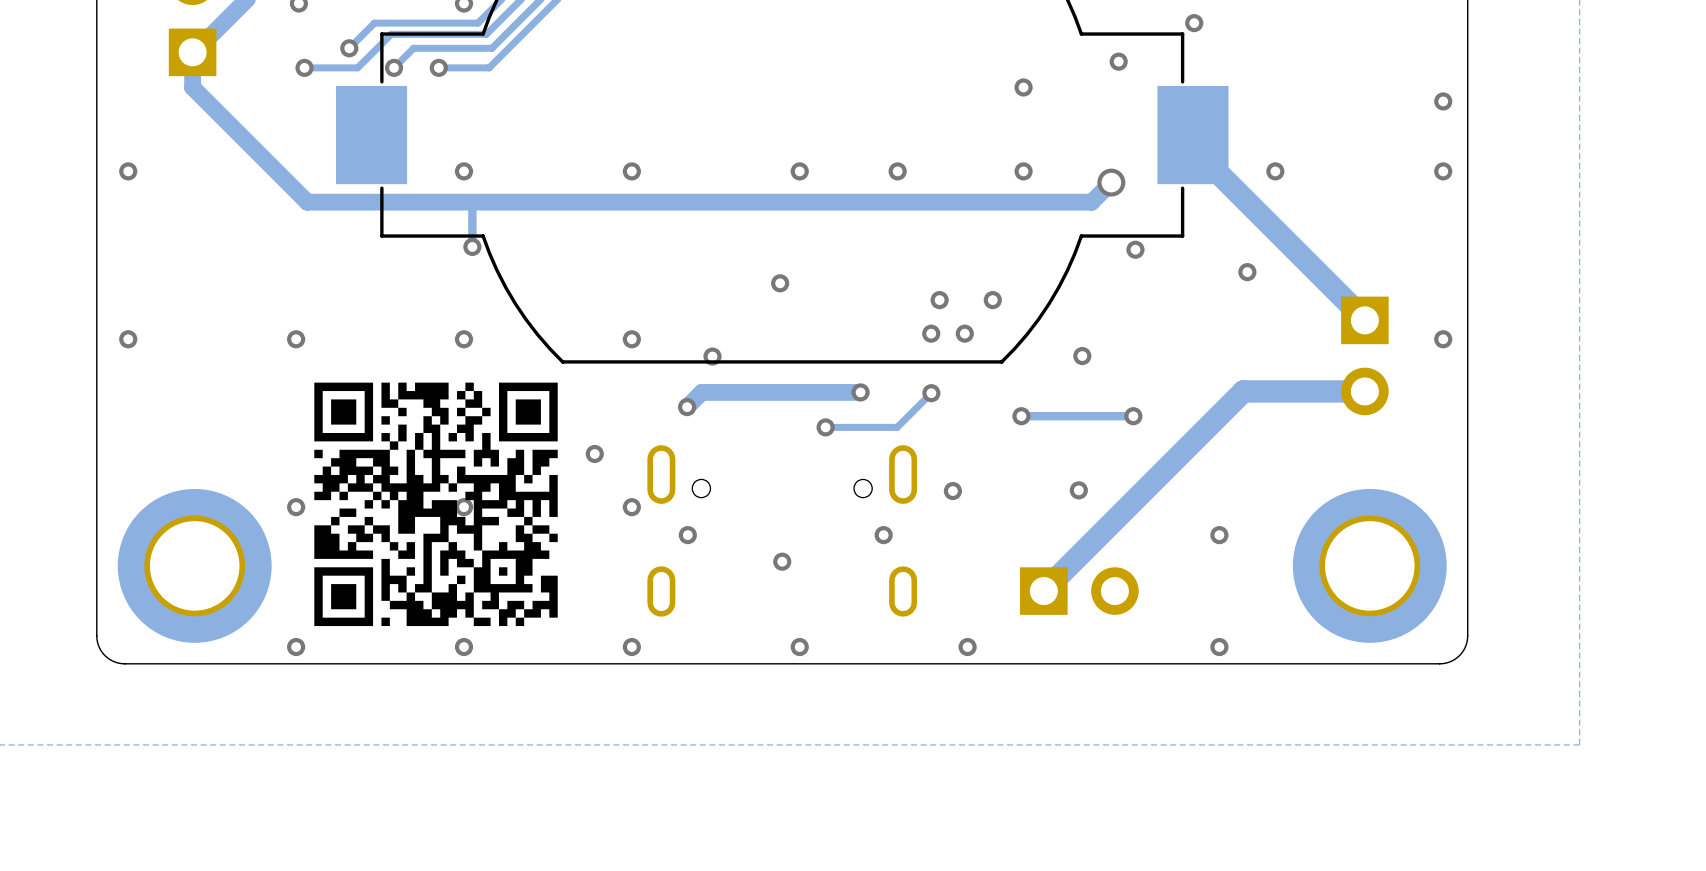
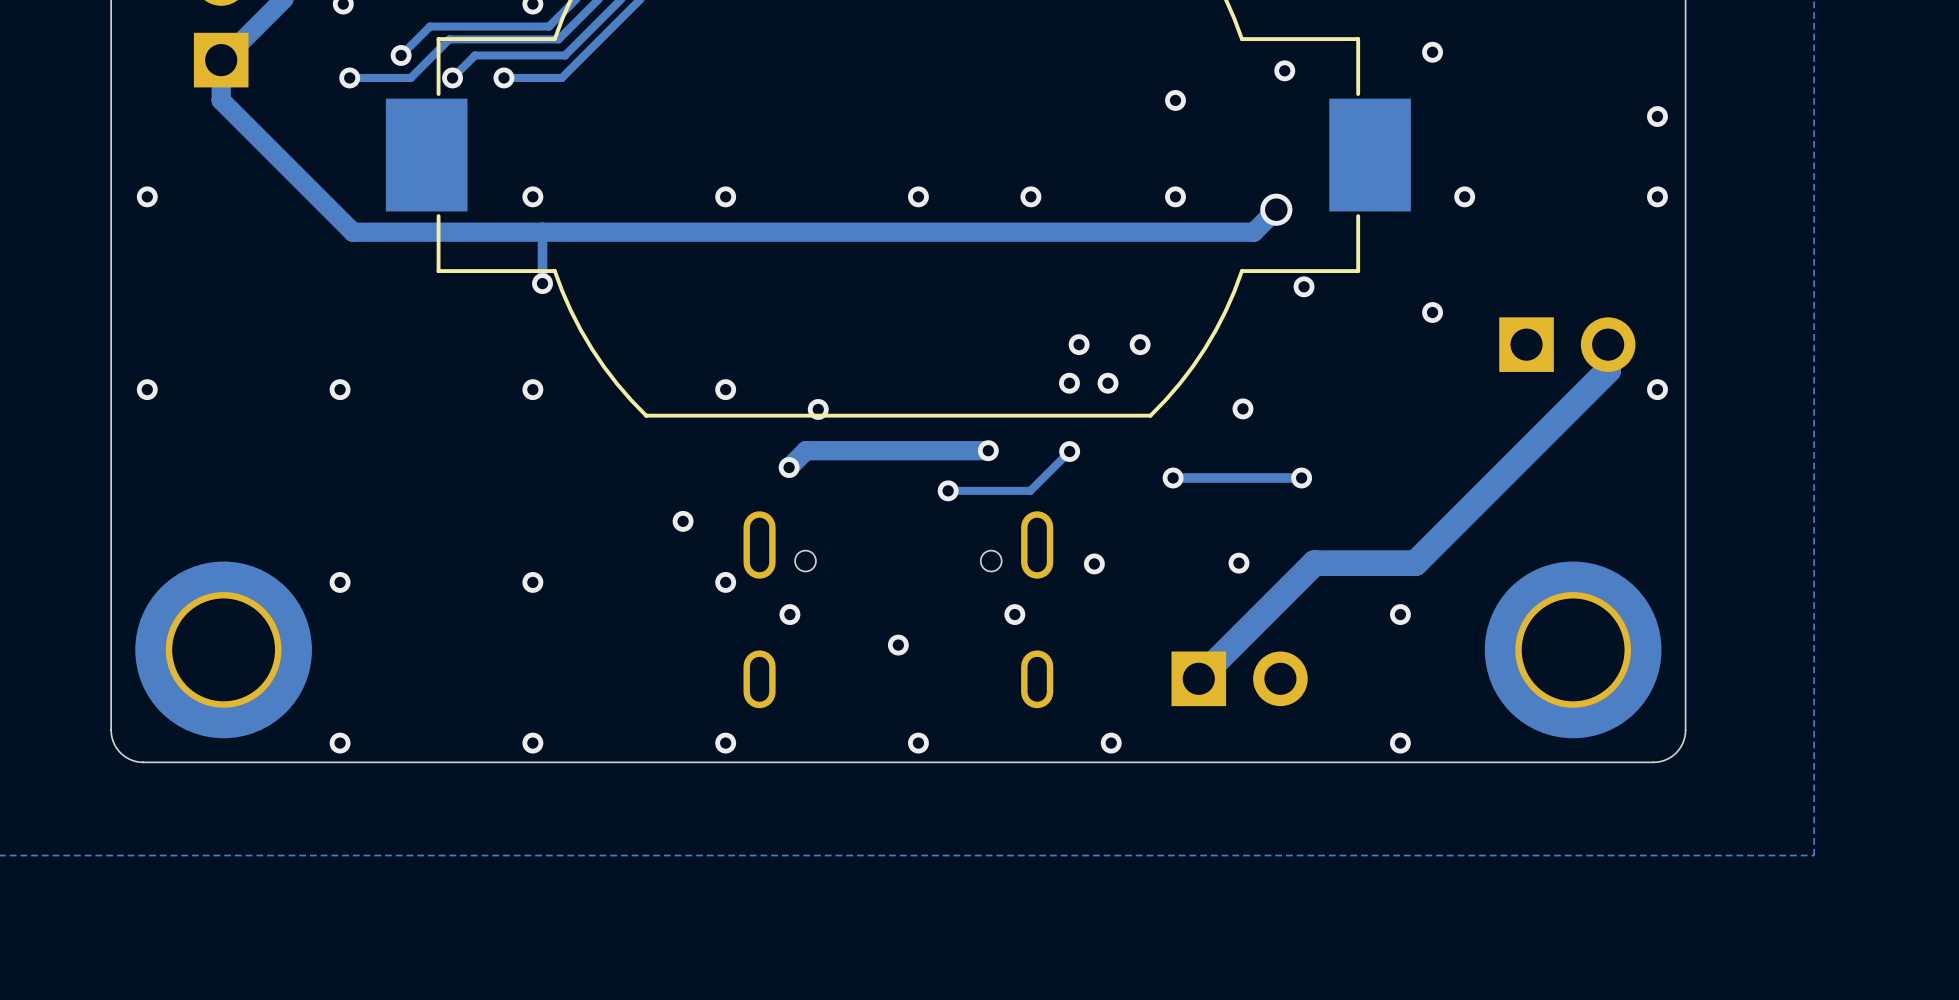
via position: (1194, 23) -> (1432, 52)
track: (1192, 147) (1364, 320) -> none
via: (780, 283) -> none
part rotation: 0° (1364, 355) -> 90° counterclockwise (1567, 344)
drawing: [314, 382, 558, 627] -> none
track: (1364, 391) (1243, 391) (1144, 490) -> (1608, 331) (1608, 370) (1415, 563) (1314, 563)

